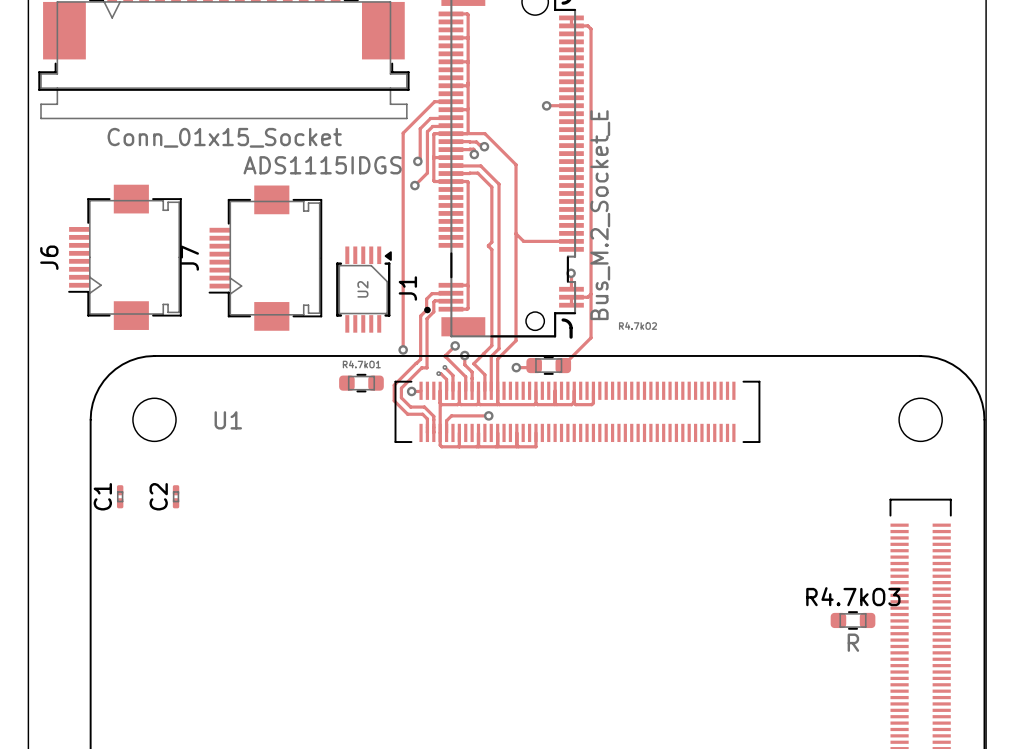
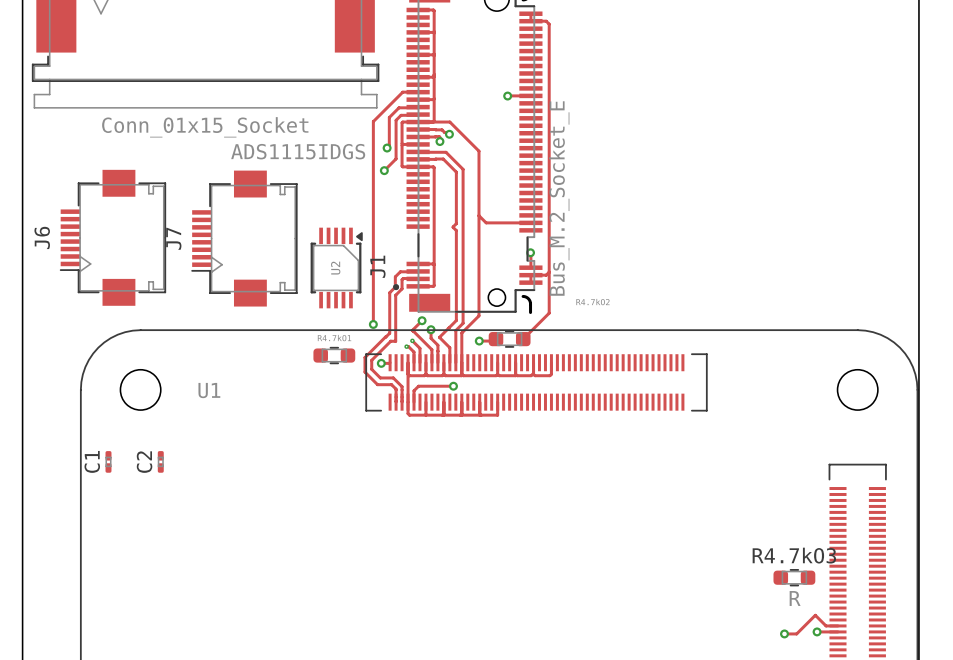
track: none -> (837, 625) (826, 625) (815, 615) (796, 633) (784, 633)
track: none -> (817, 631) (837, 631)
via: none -> (817, 631)
via: none -> (784, 633)

